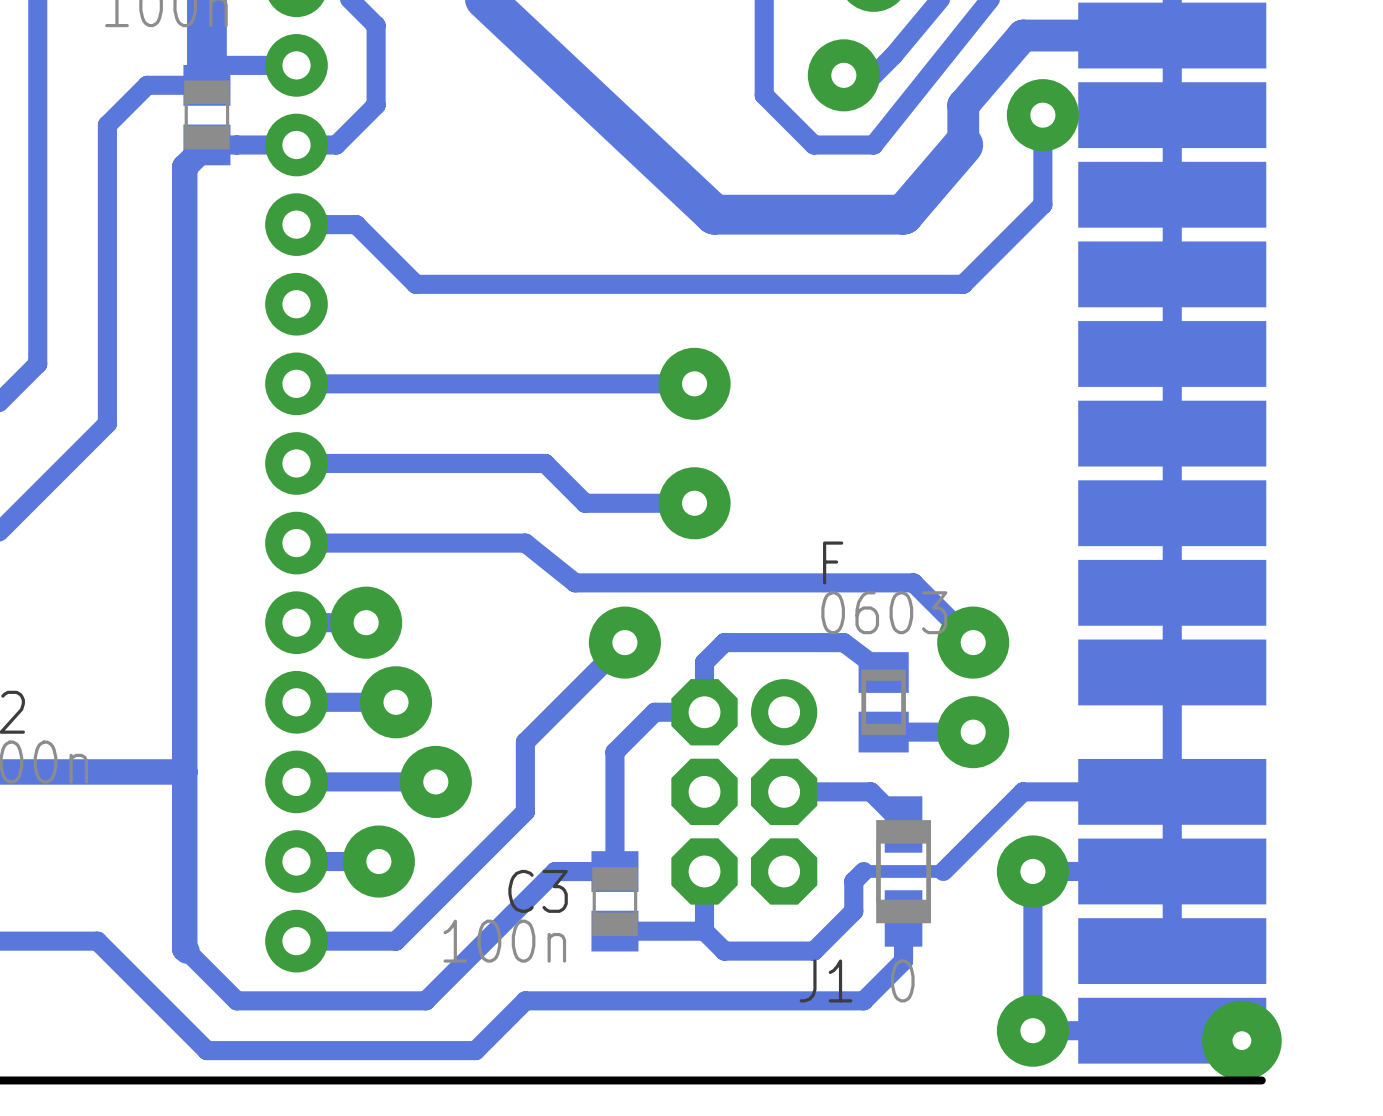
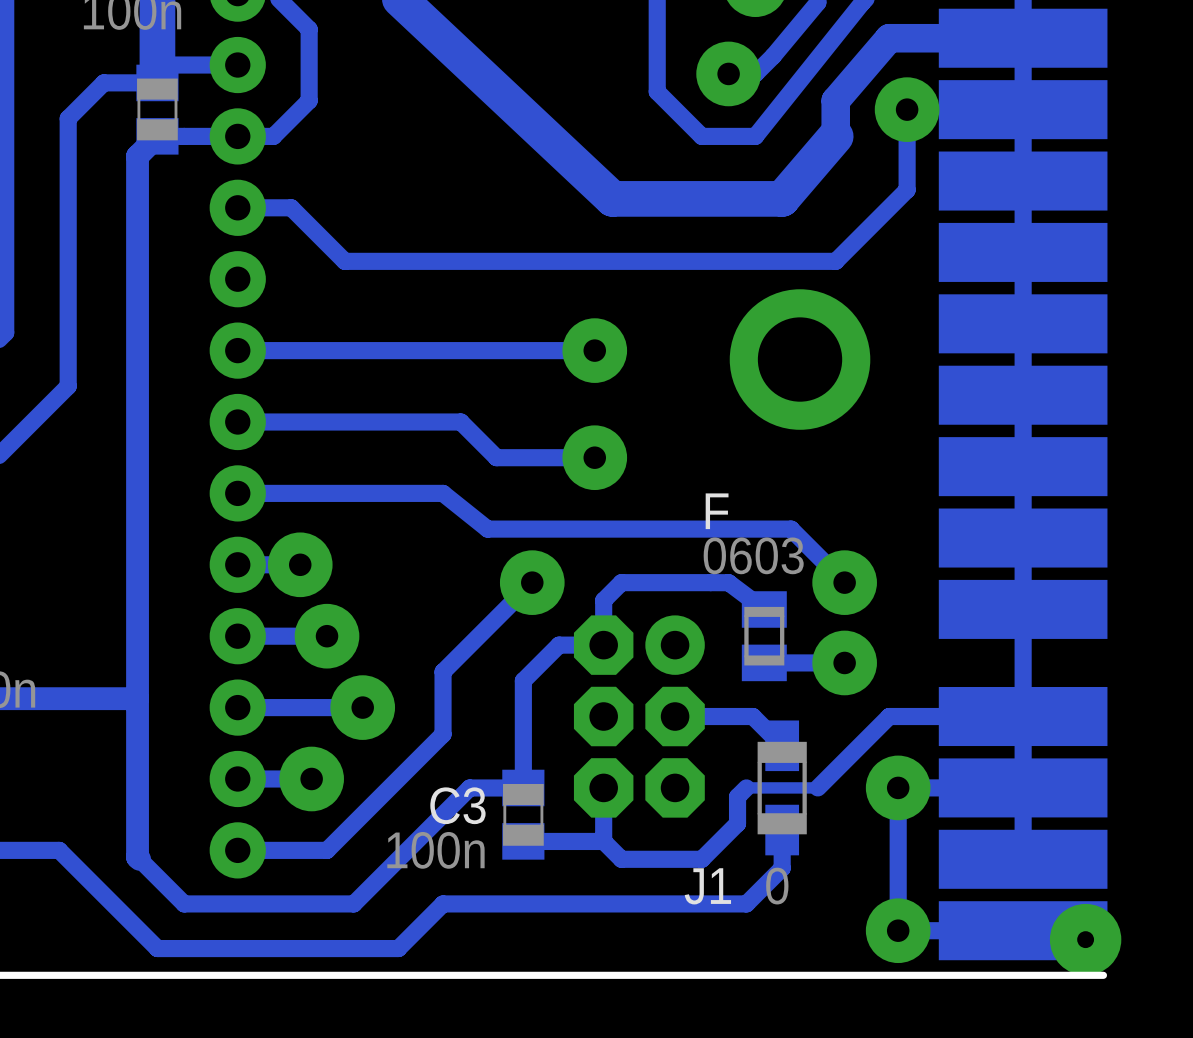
via: none -> (800, 359)

